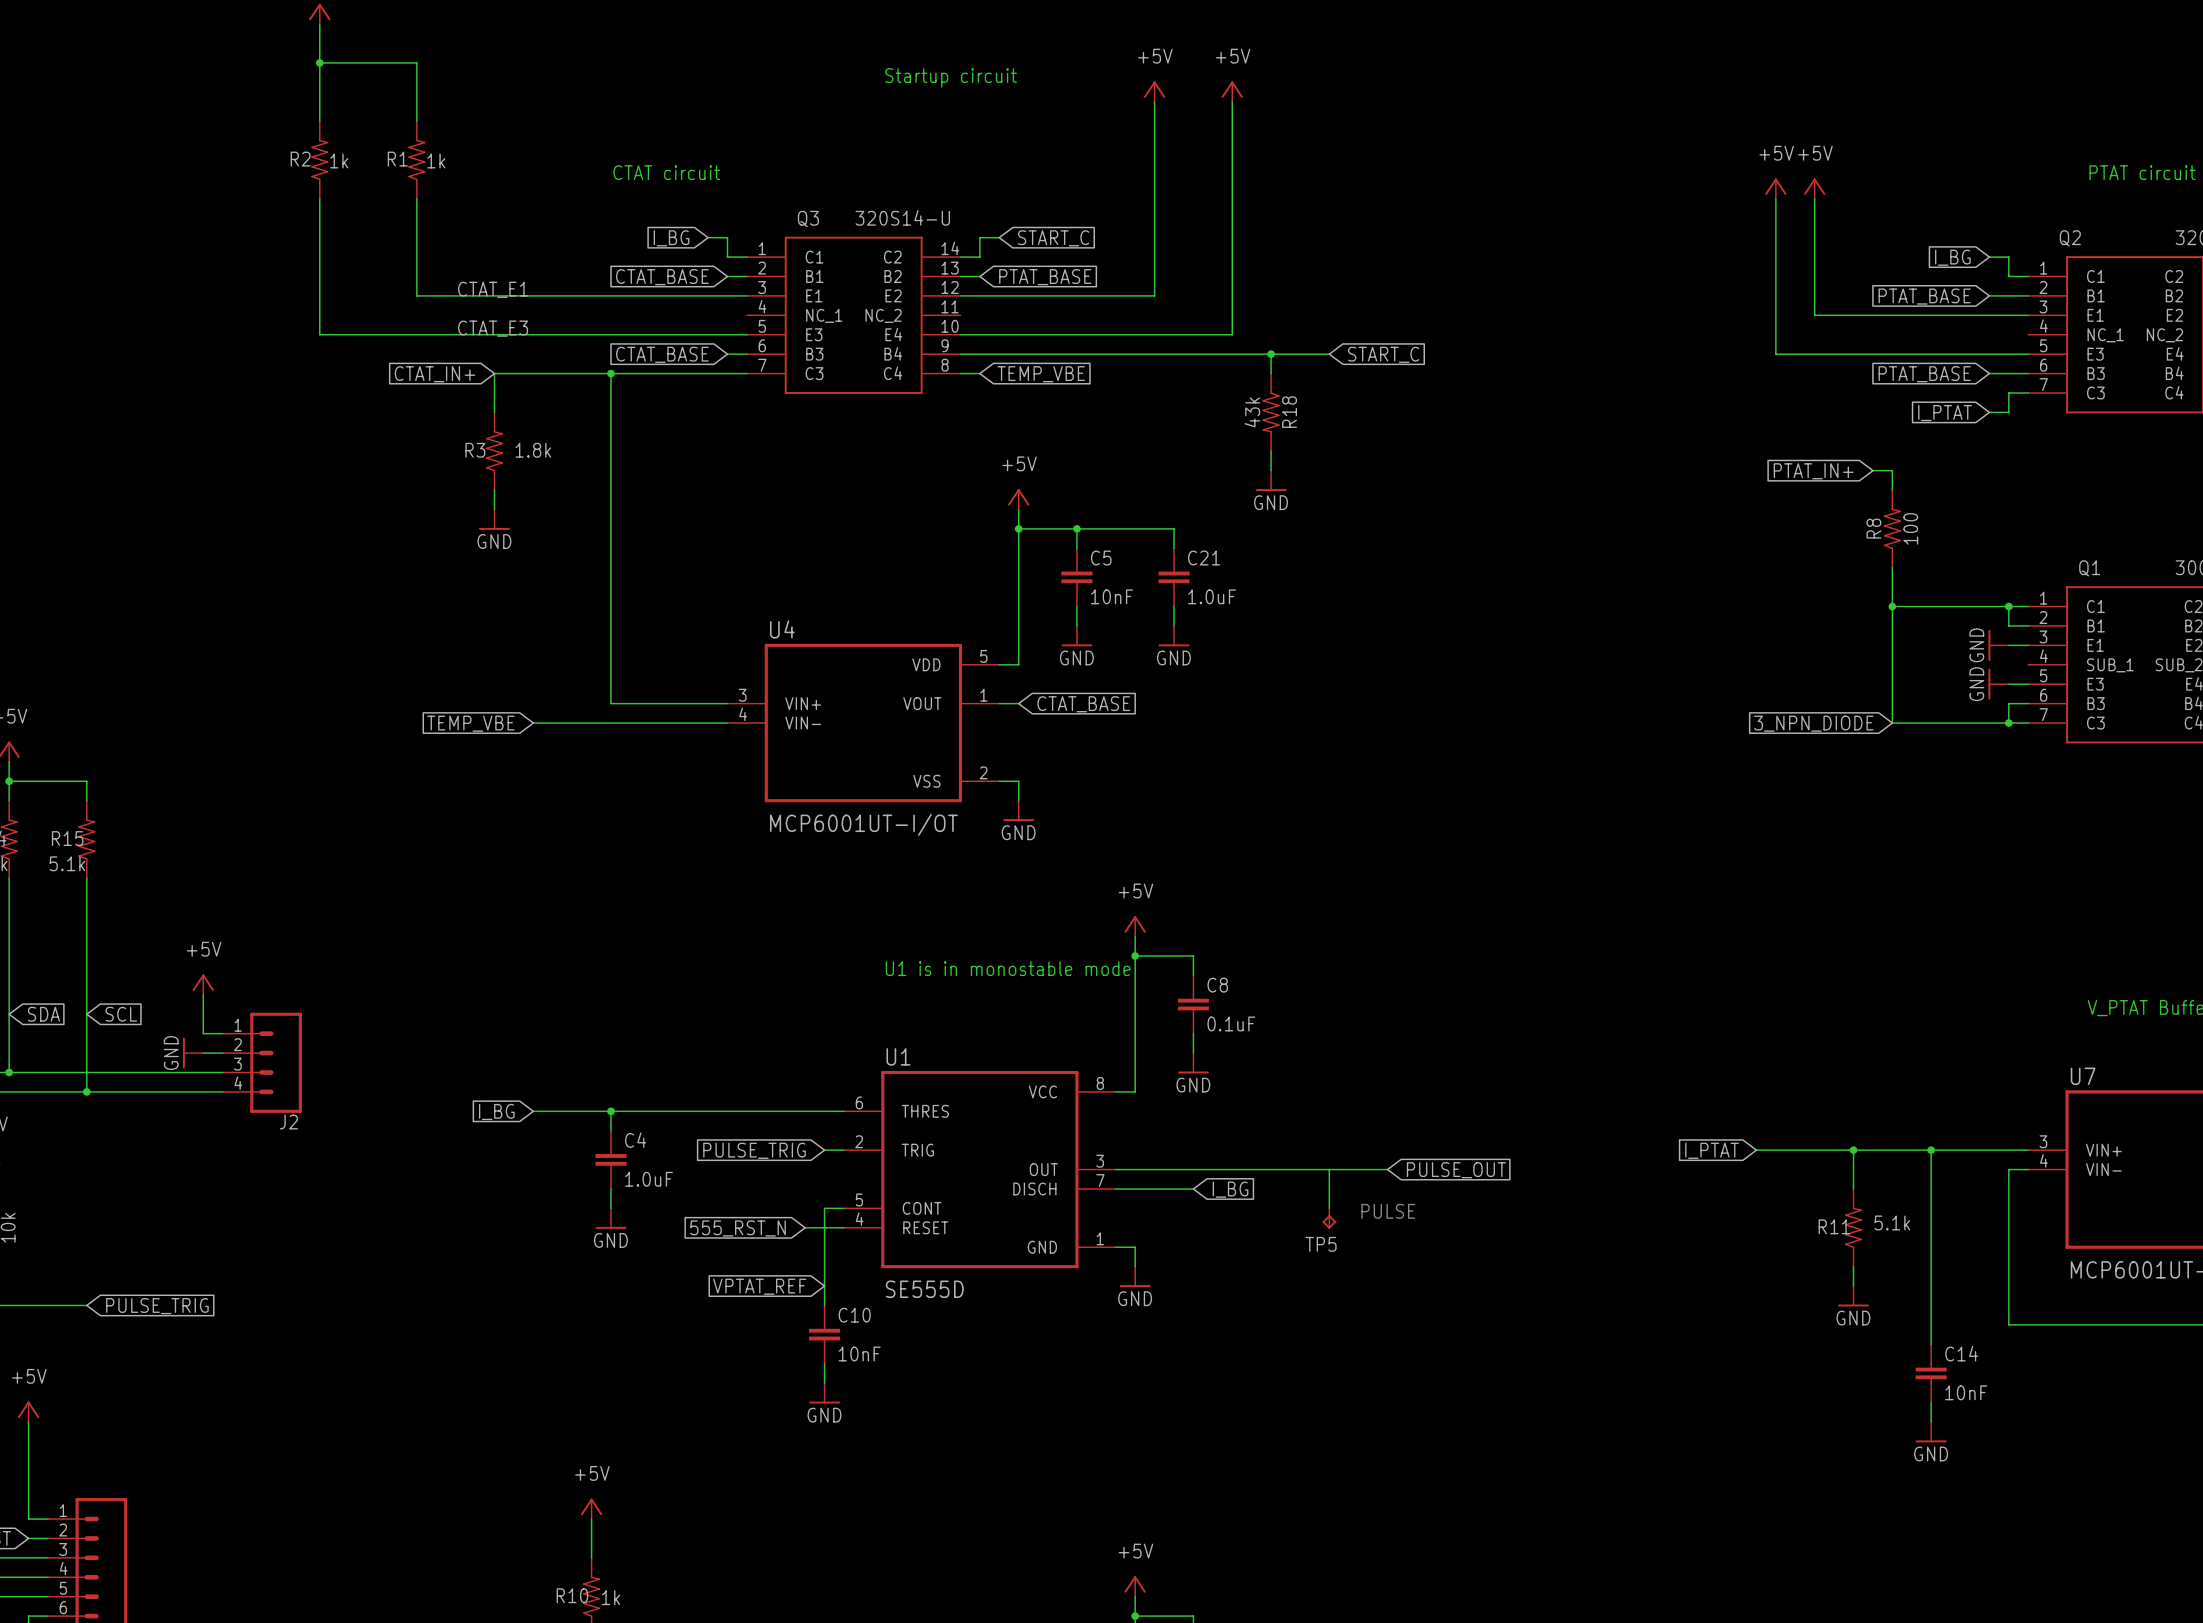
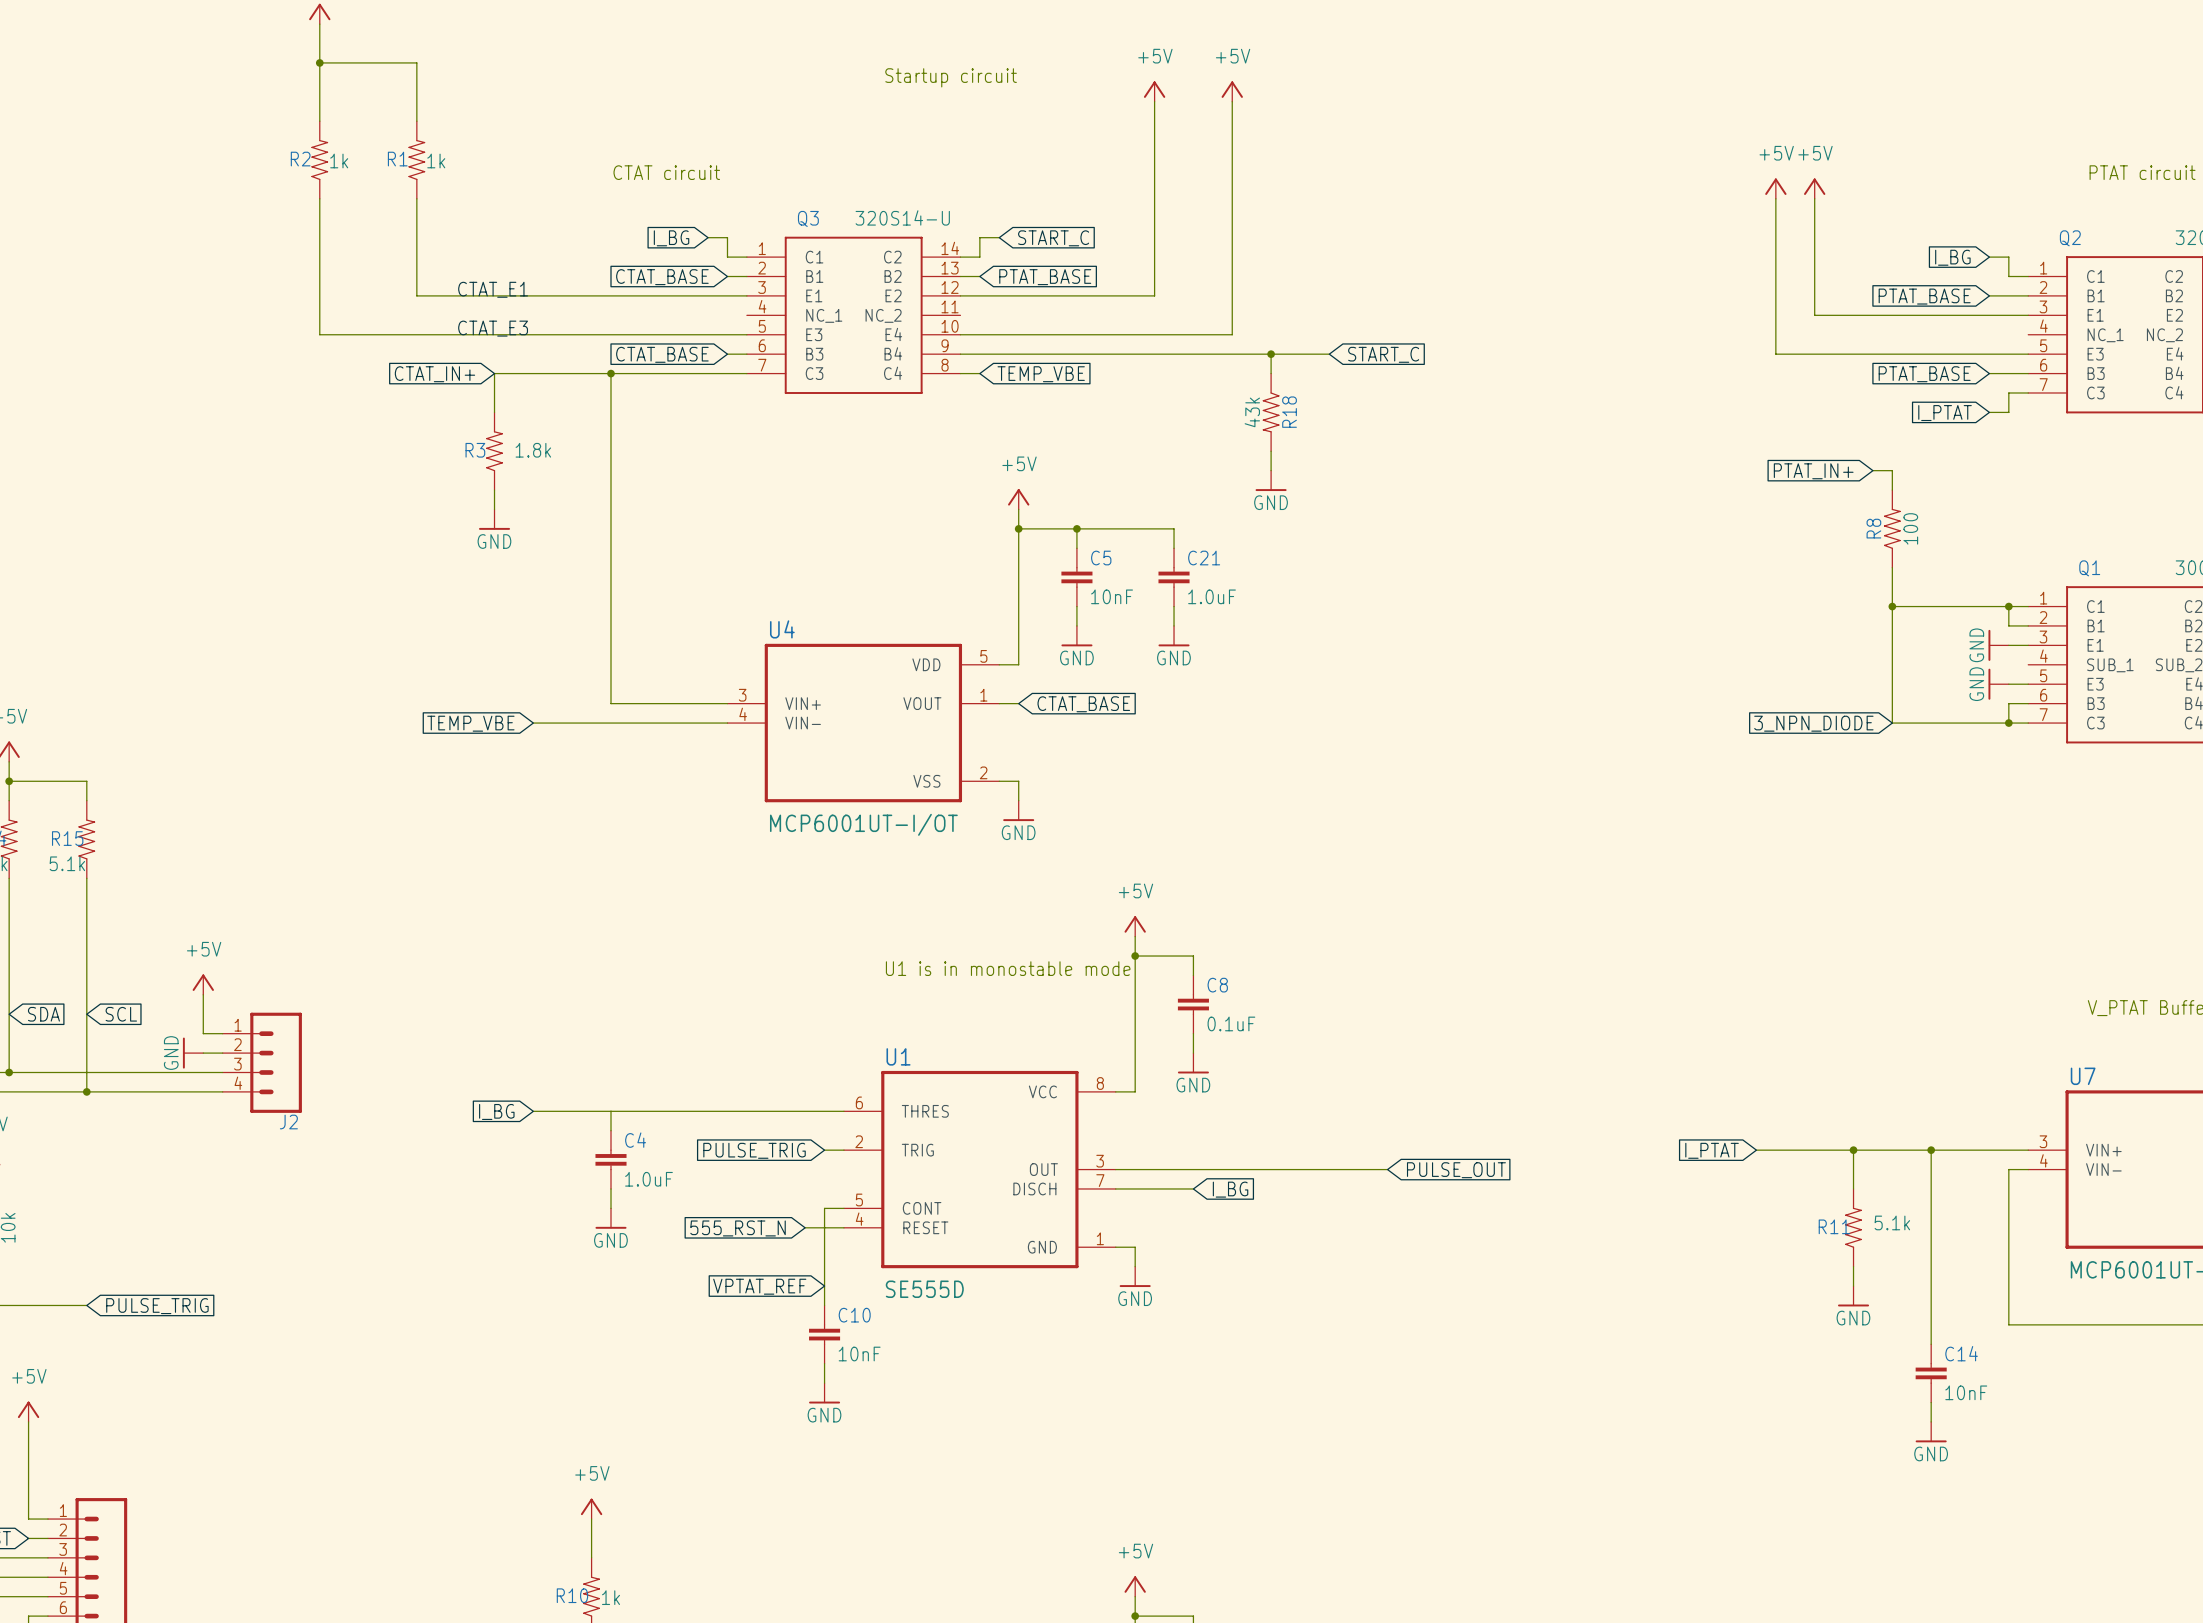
junction: (611, 1111) -> none
wire: (1329, 1169) (1329, 1208) -> none
TP5: (1329, 1218) -> none

